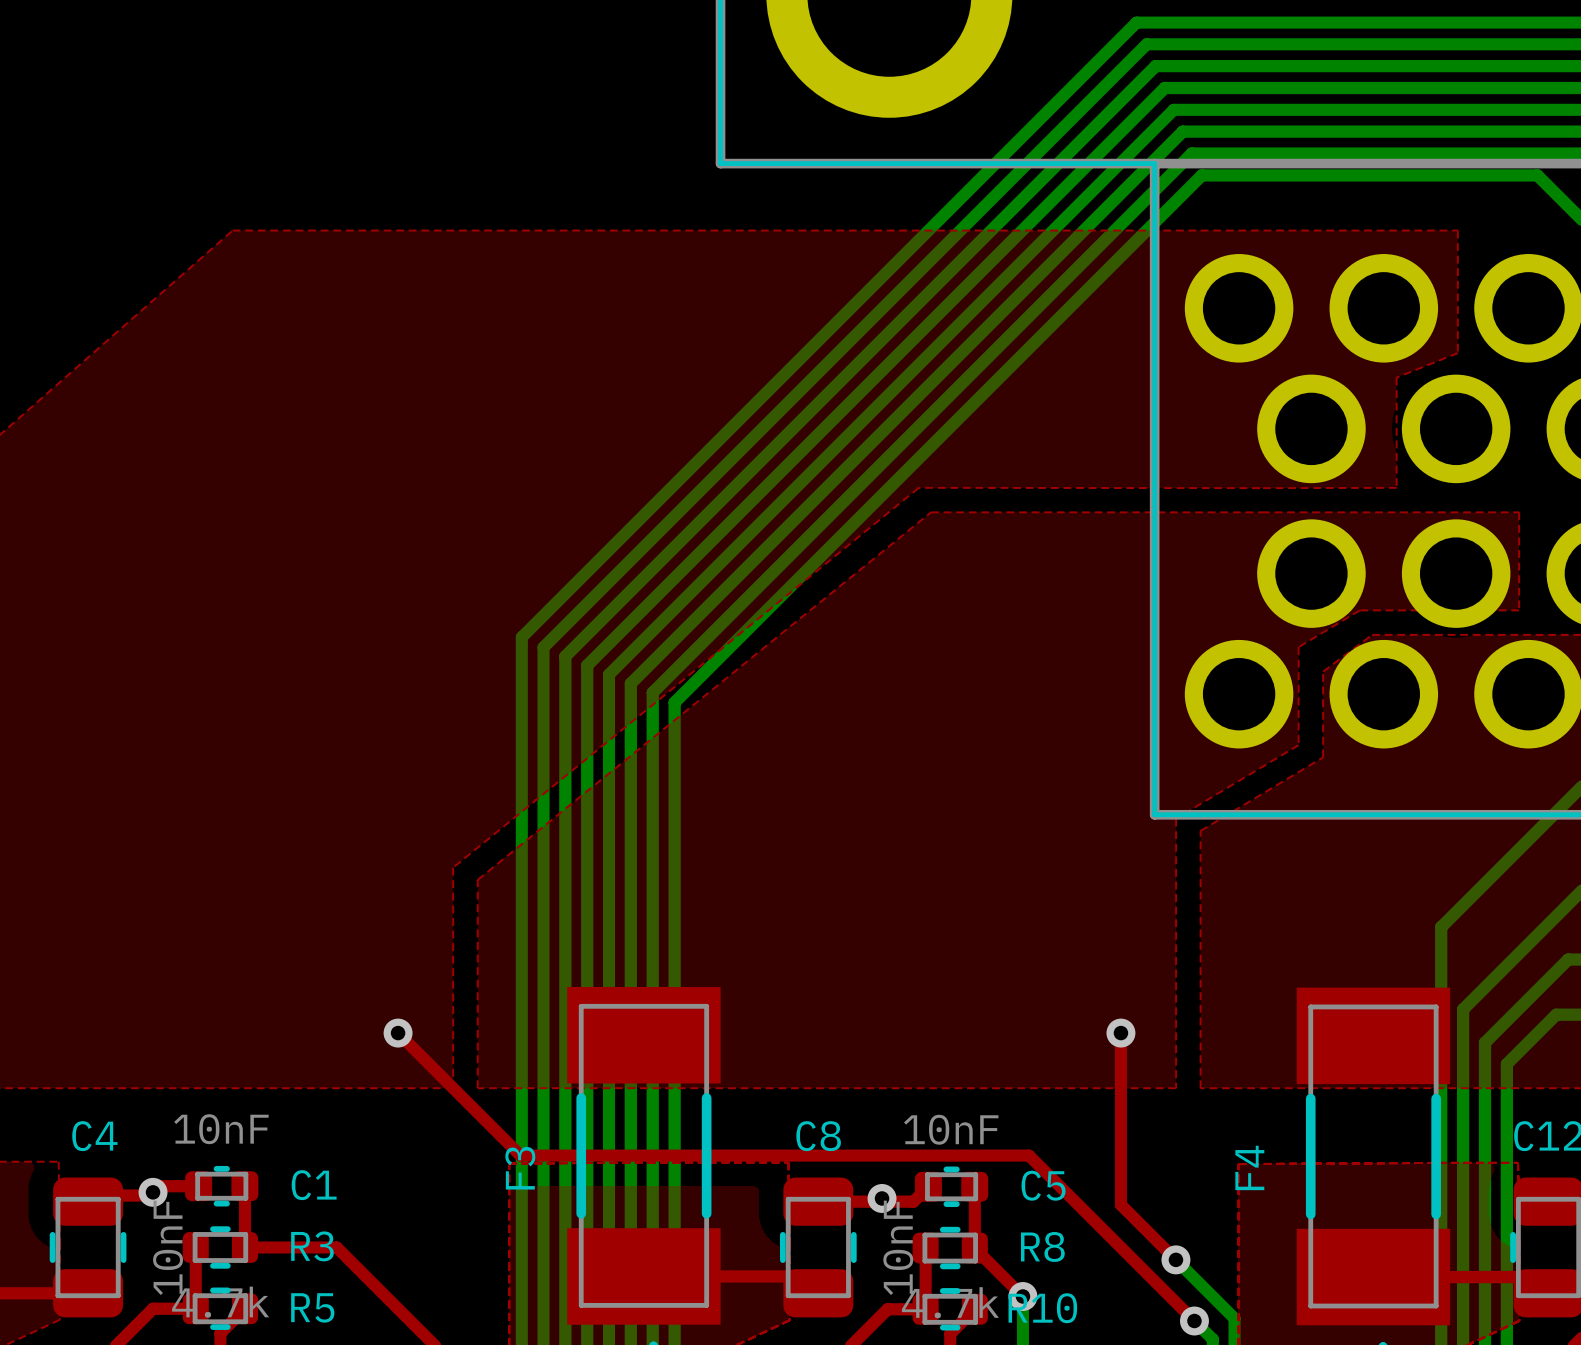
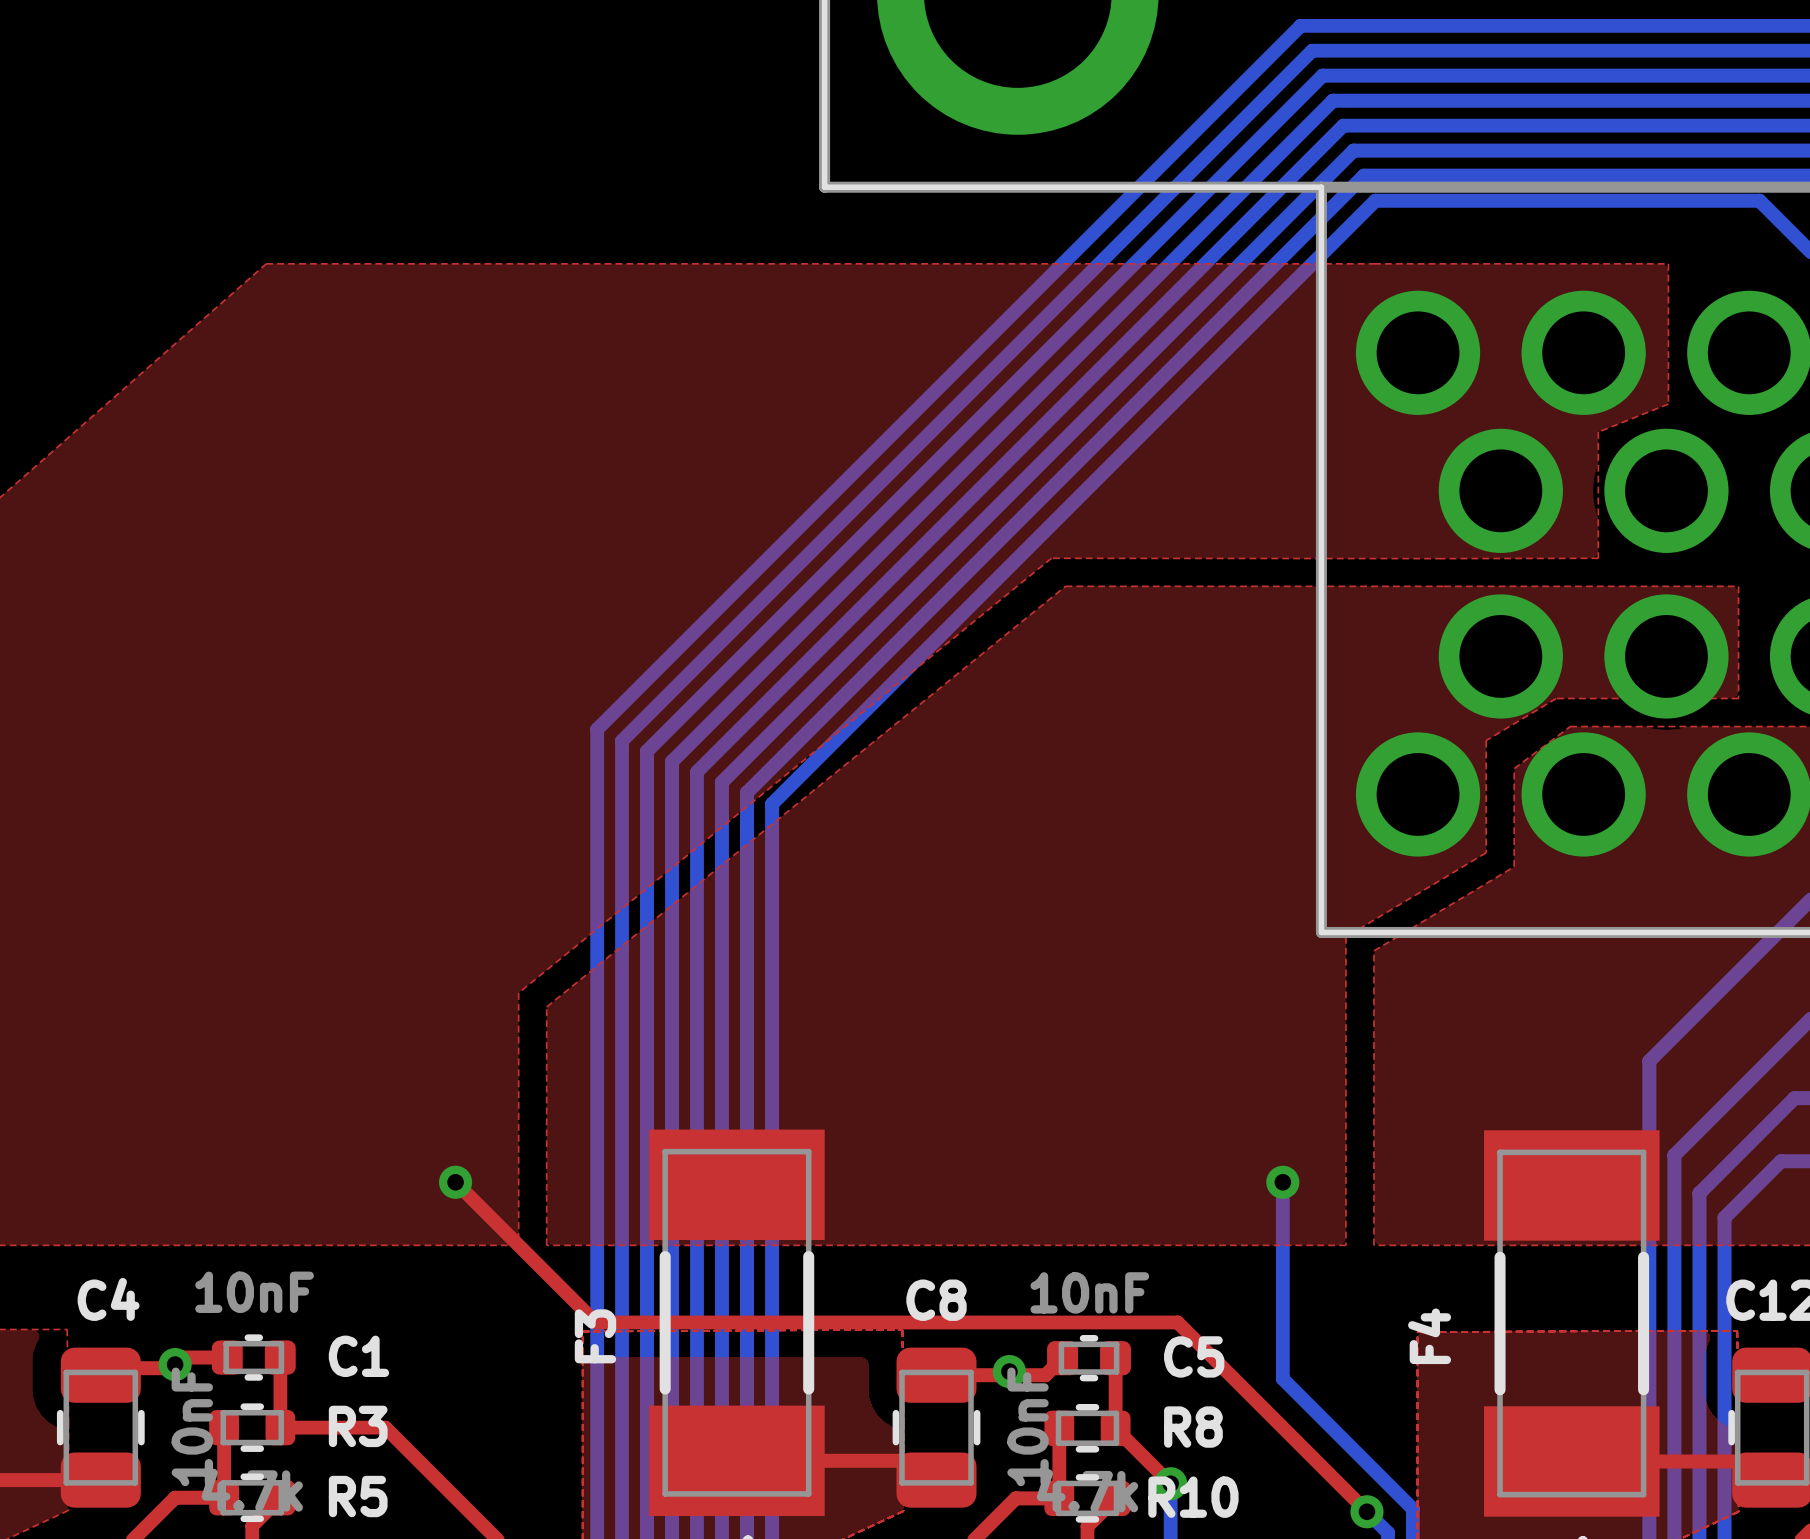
top track: (1120, 1033) (1120, 1204) (1175, 1259) -> none
bottom track: none -> (1282, 1182) (1282, 1378) (1345, 1441)
via: (1175, 1259) -> none

